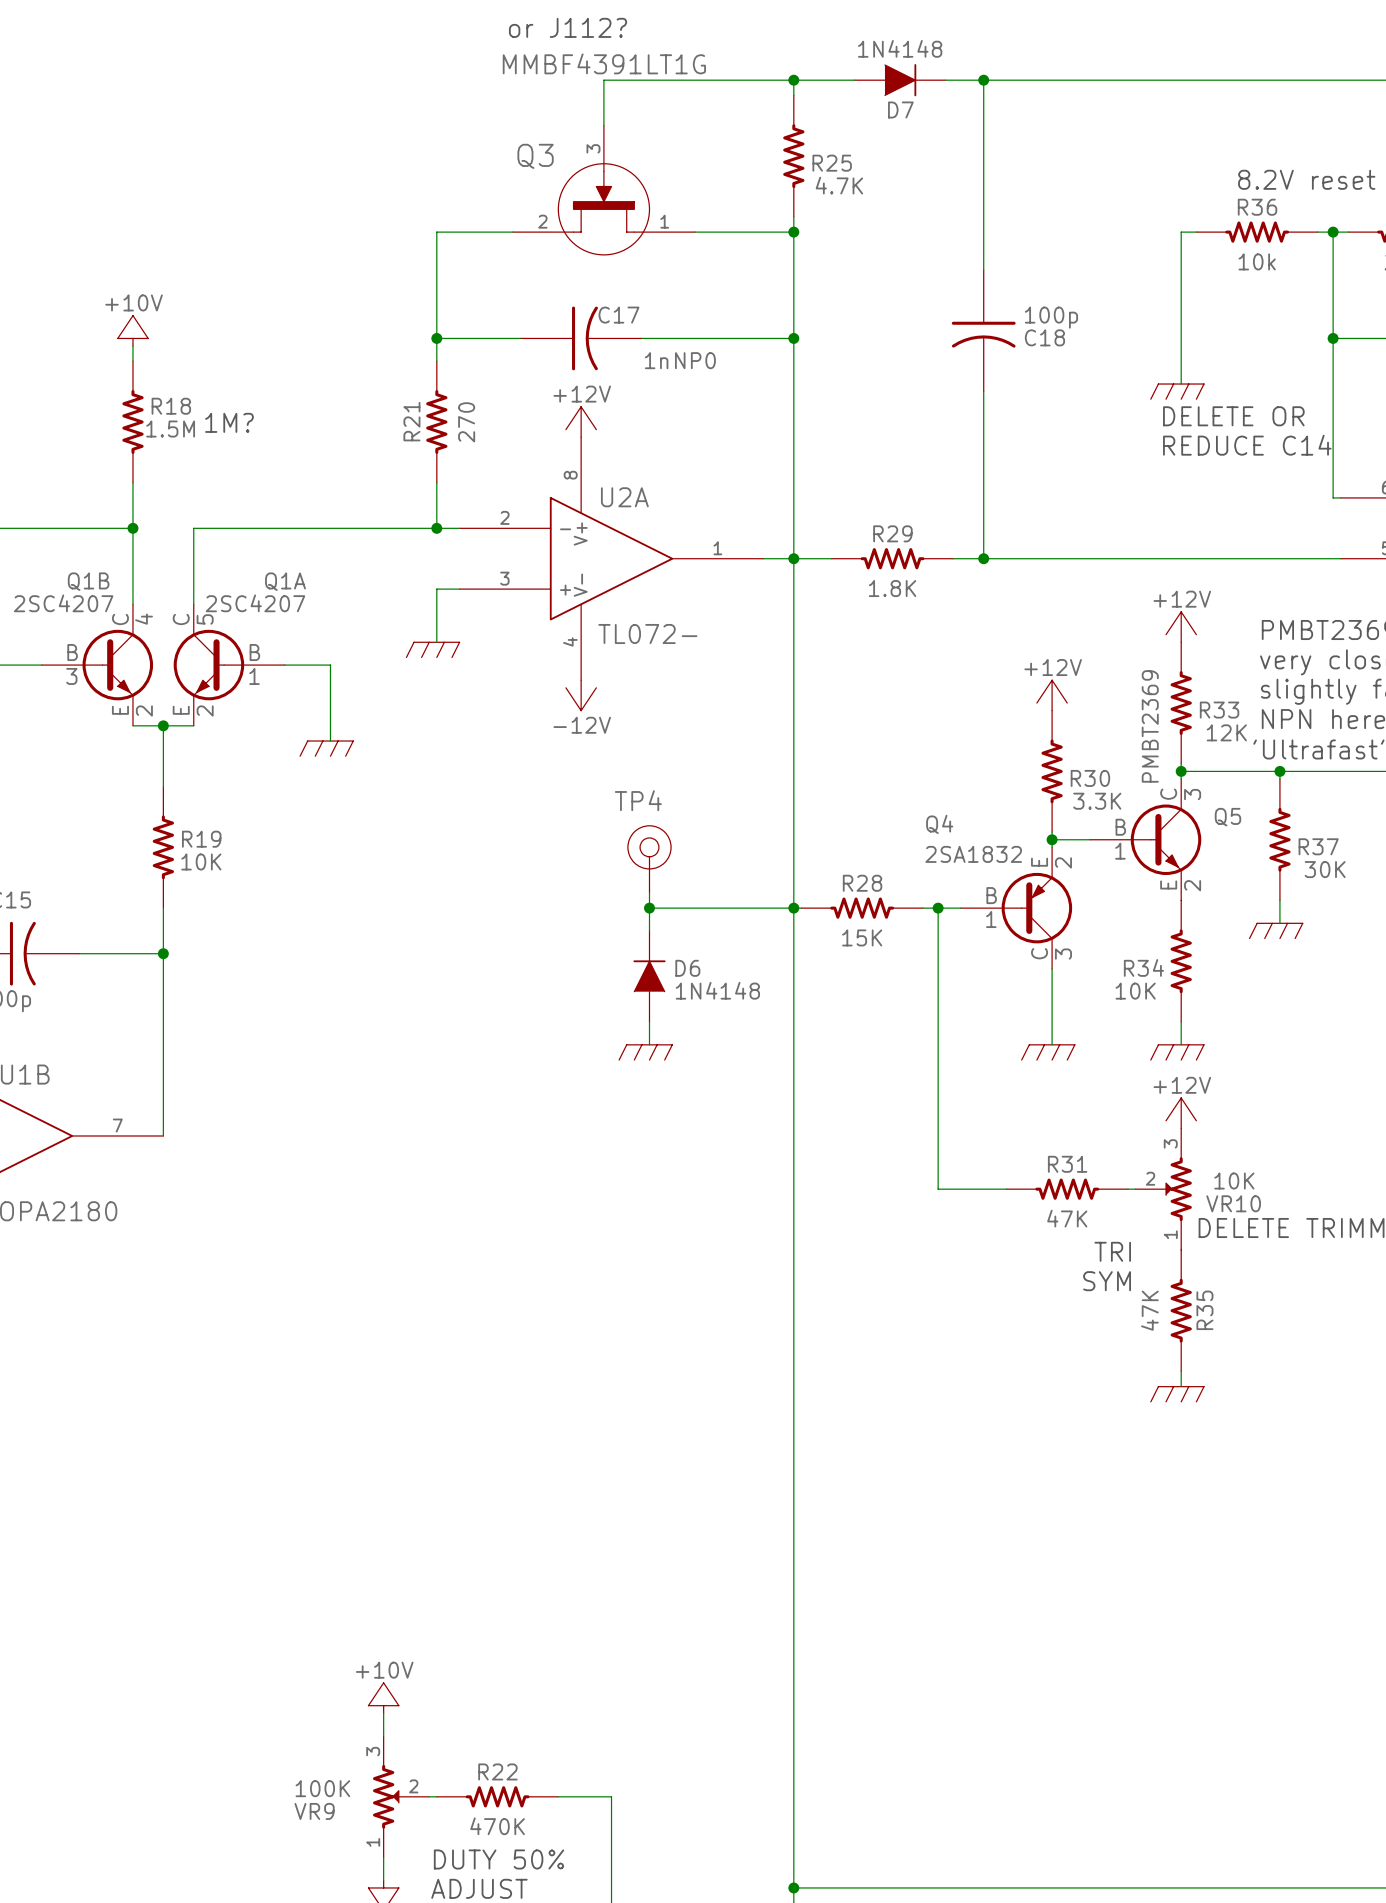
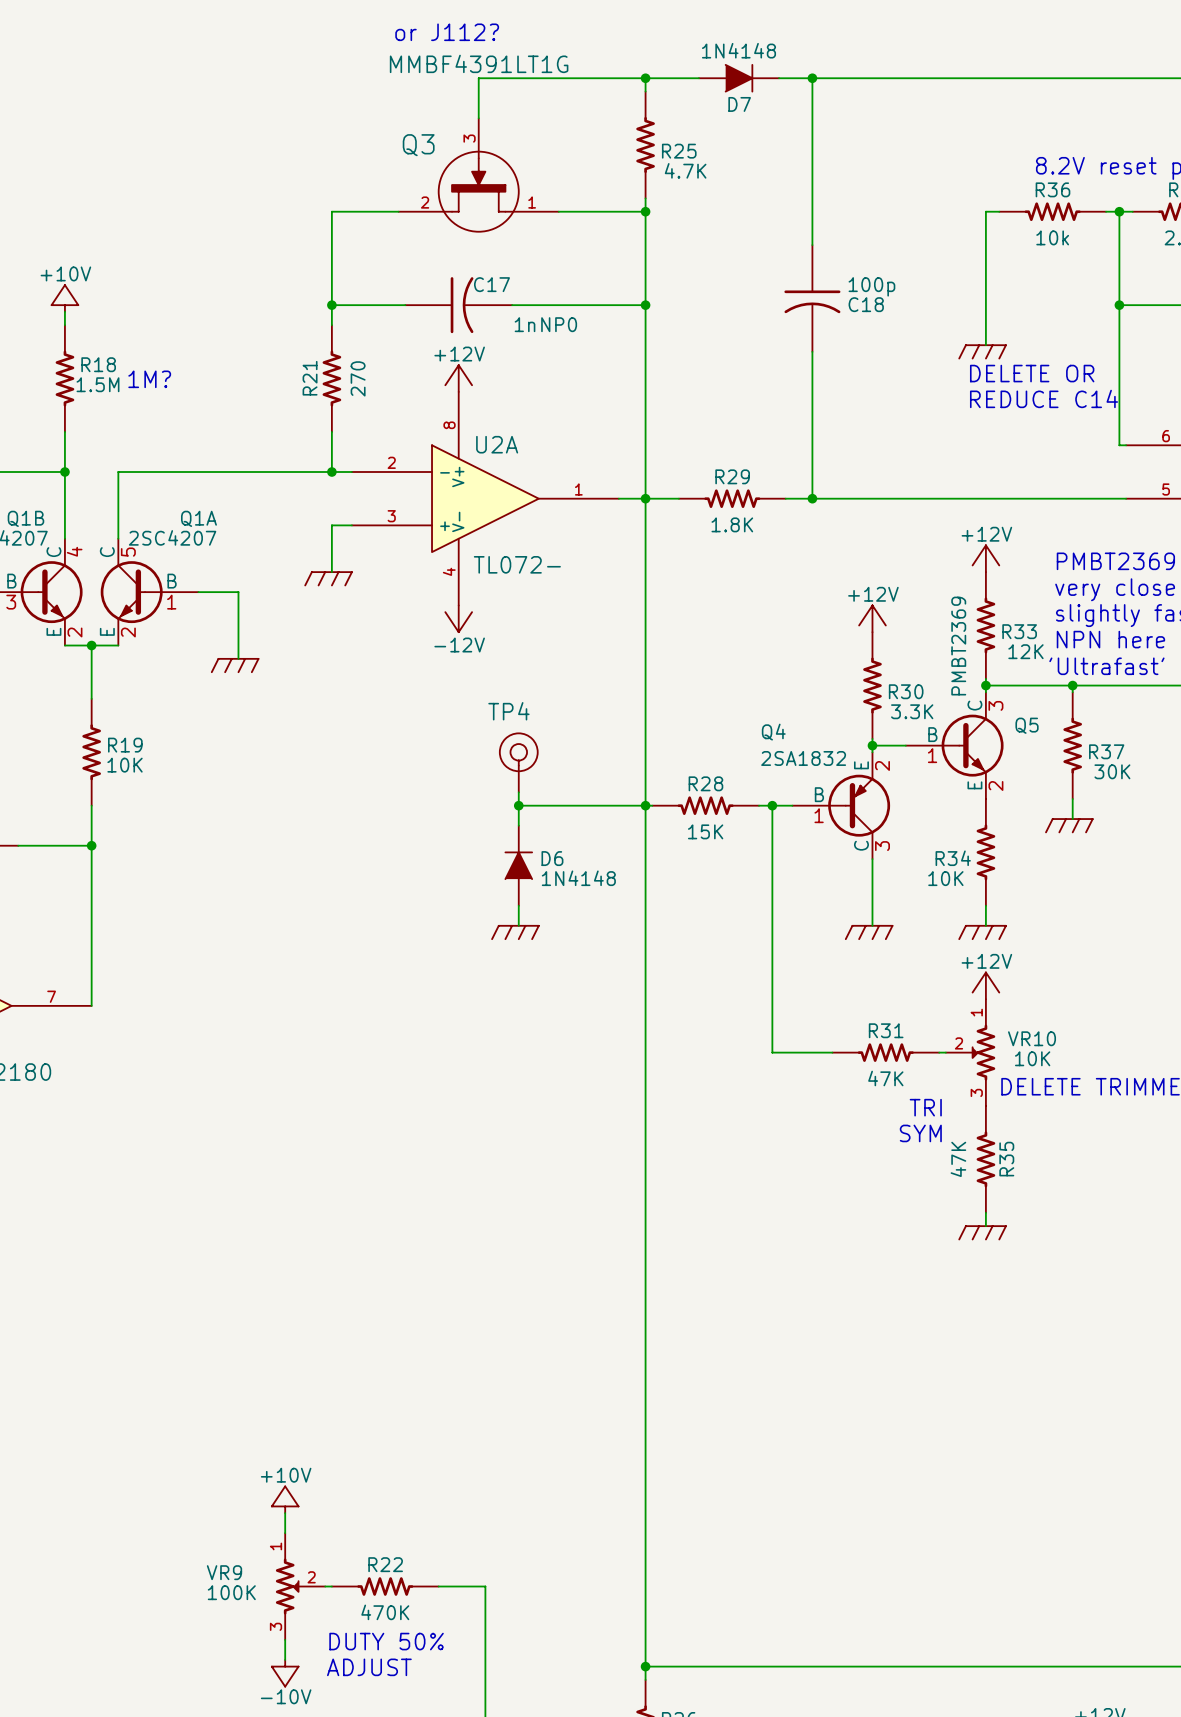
VR10 flip: as is (1178, 1189) -> up-down (983, 1052)
VR9 flip: as is (385, 1796) -> up-down (287, 1586)

